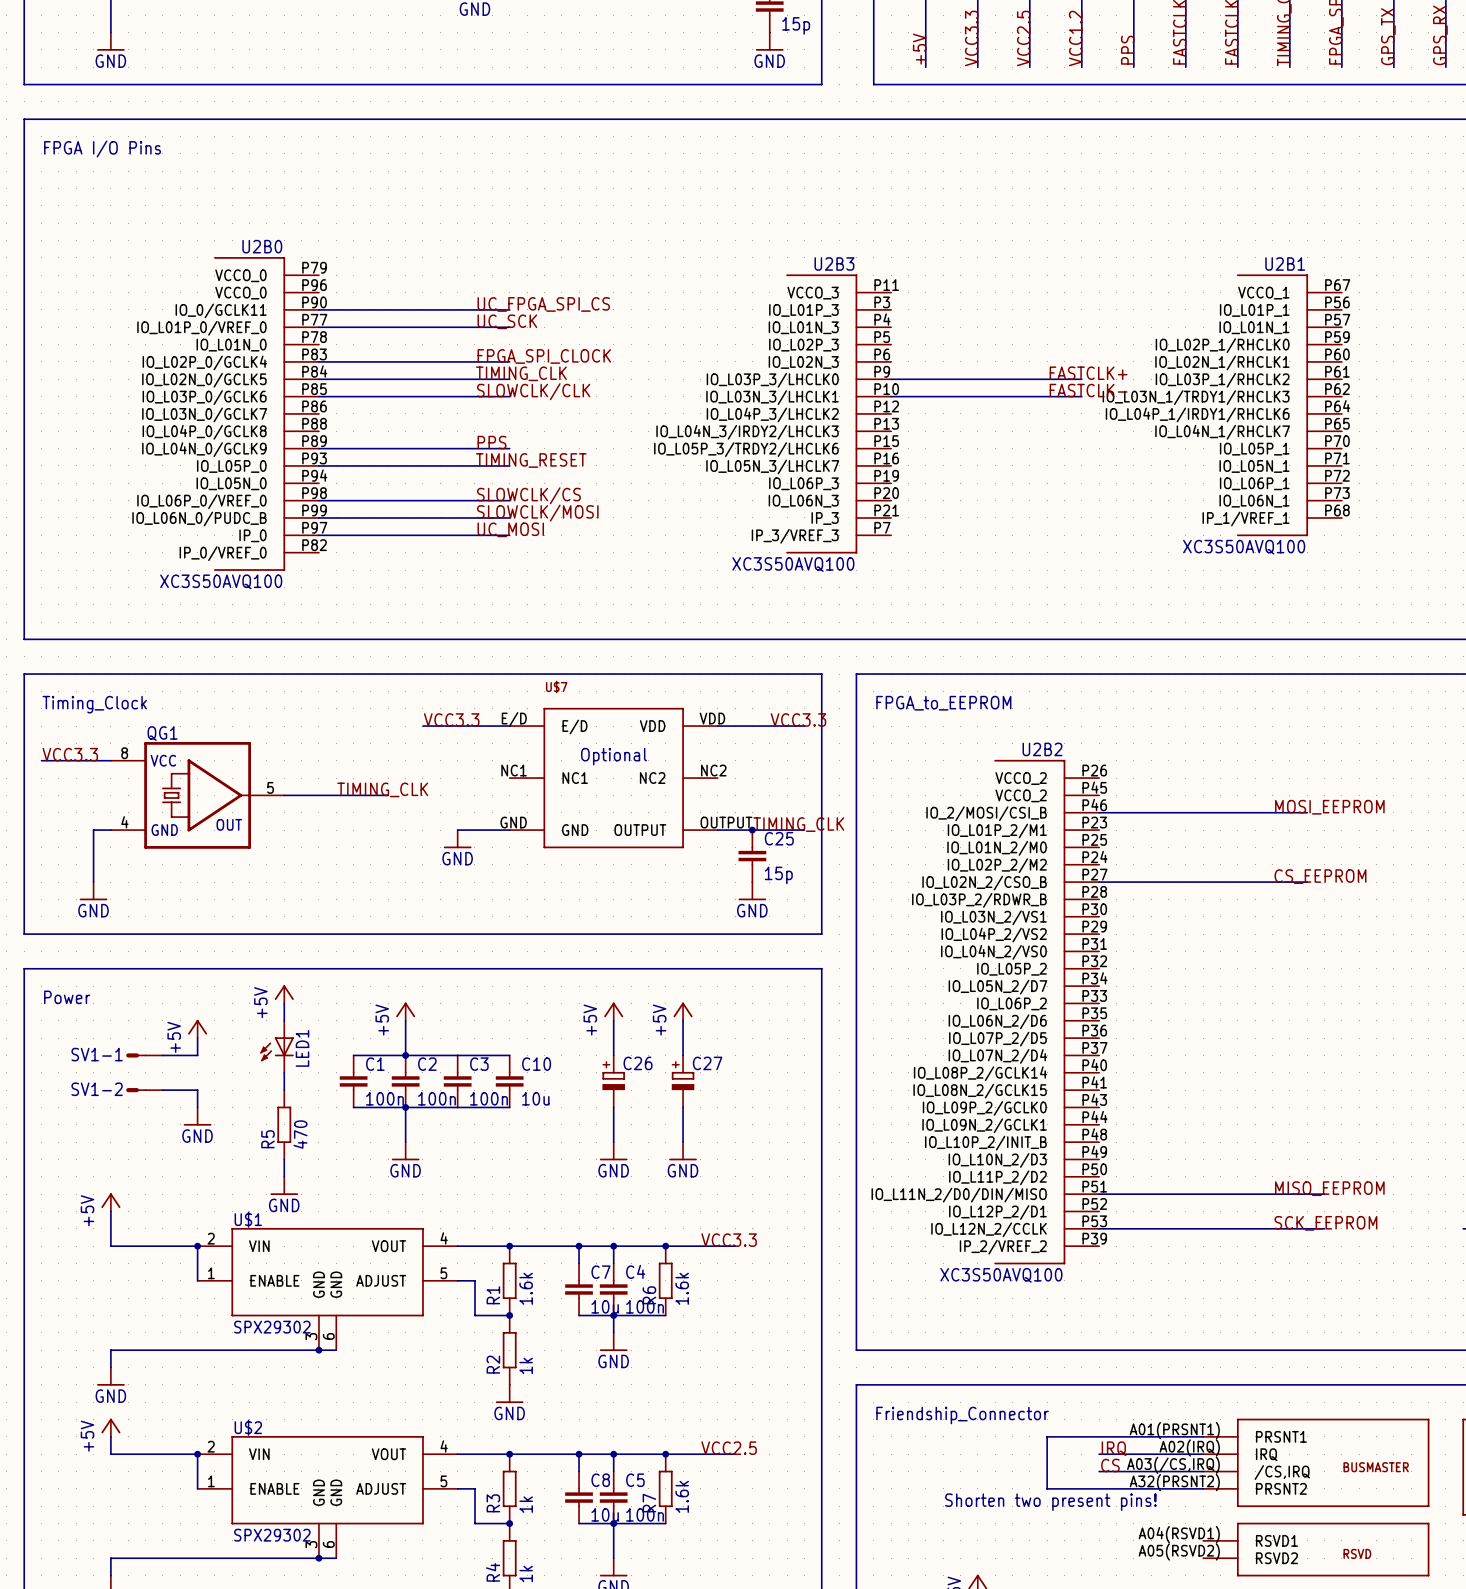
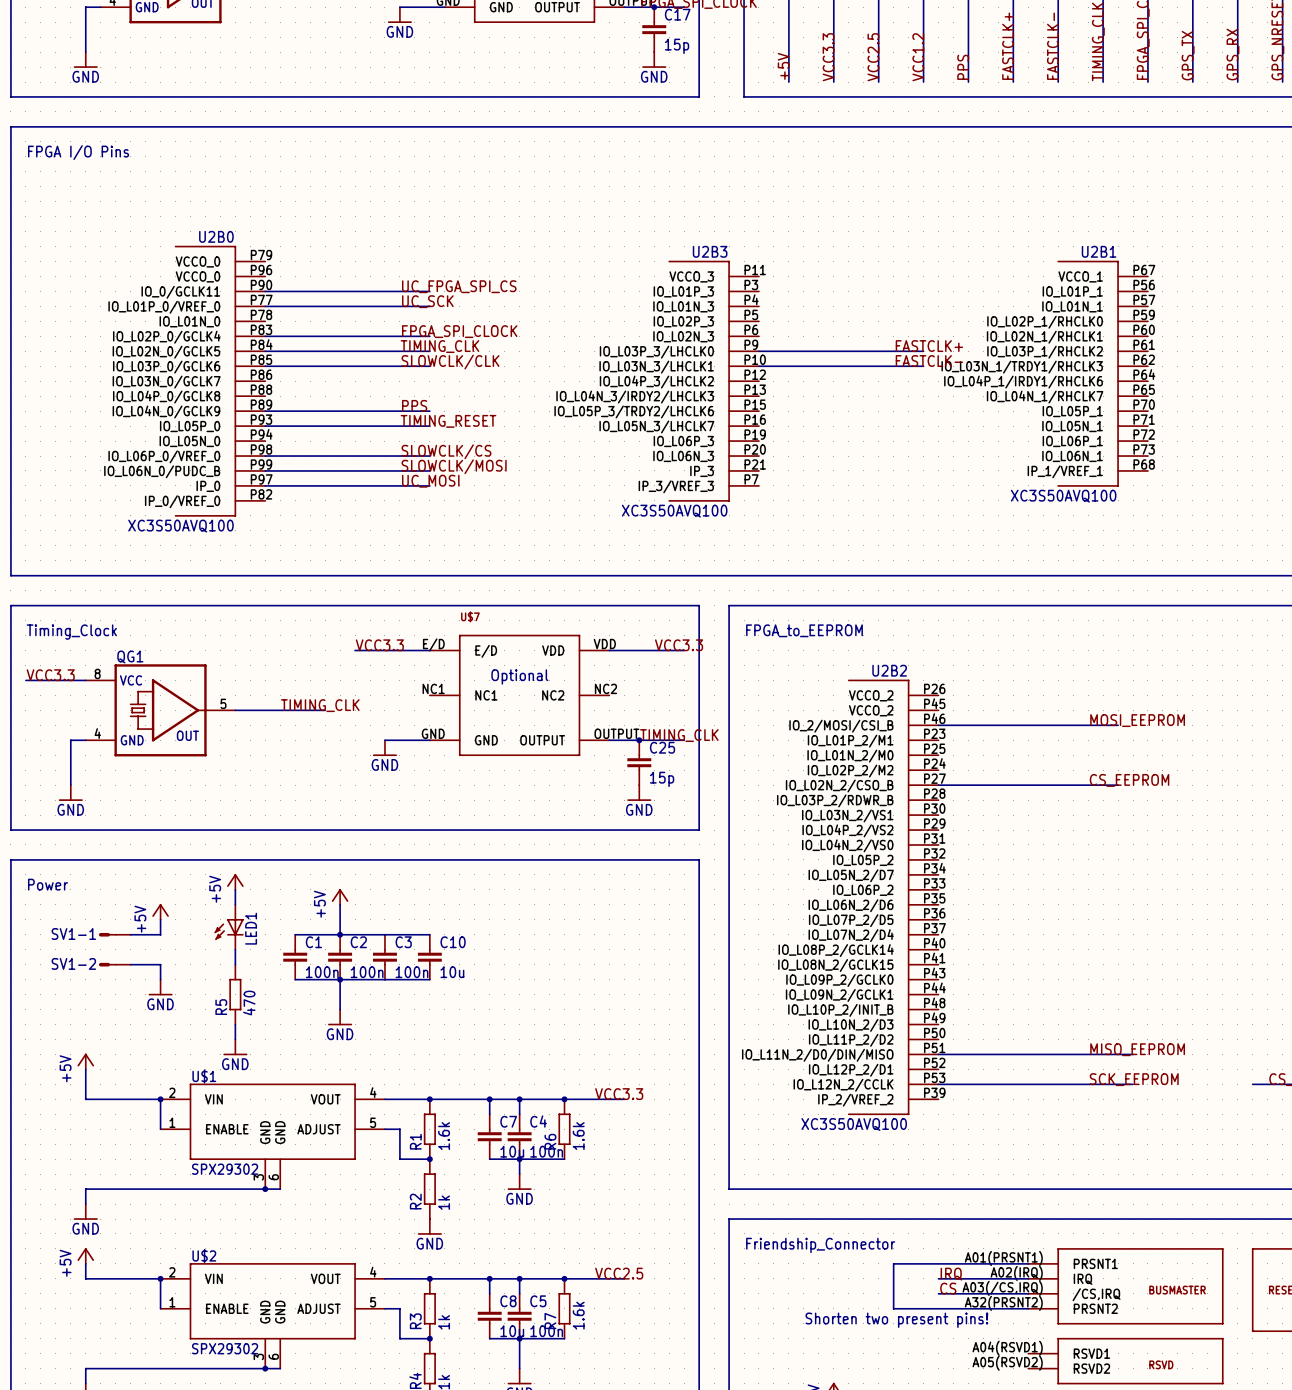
power symbol: +5V (613, 1011) -> none
power symbol: +5V (683, 1011) -> none
wire: (613, 1020) (613, 1055) -> none
wire: (683, 1020) (683, 1055) -> none
C26: (613, 1081) -> none
C27: (683, 1081) -> none
wire: (613, 1107) (613, 1142) -> none
wire: (683, 1107) (683, 1142) -> none
power symbol: GND (613, 1151) -> none
power symbol: GND (683, 1151) -> none

